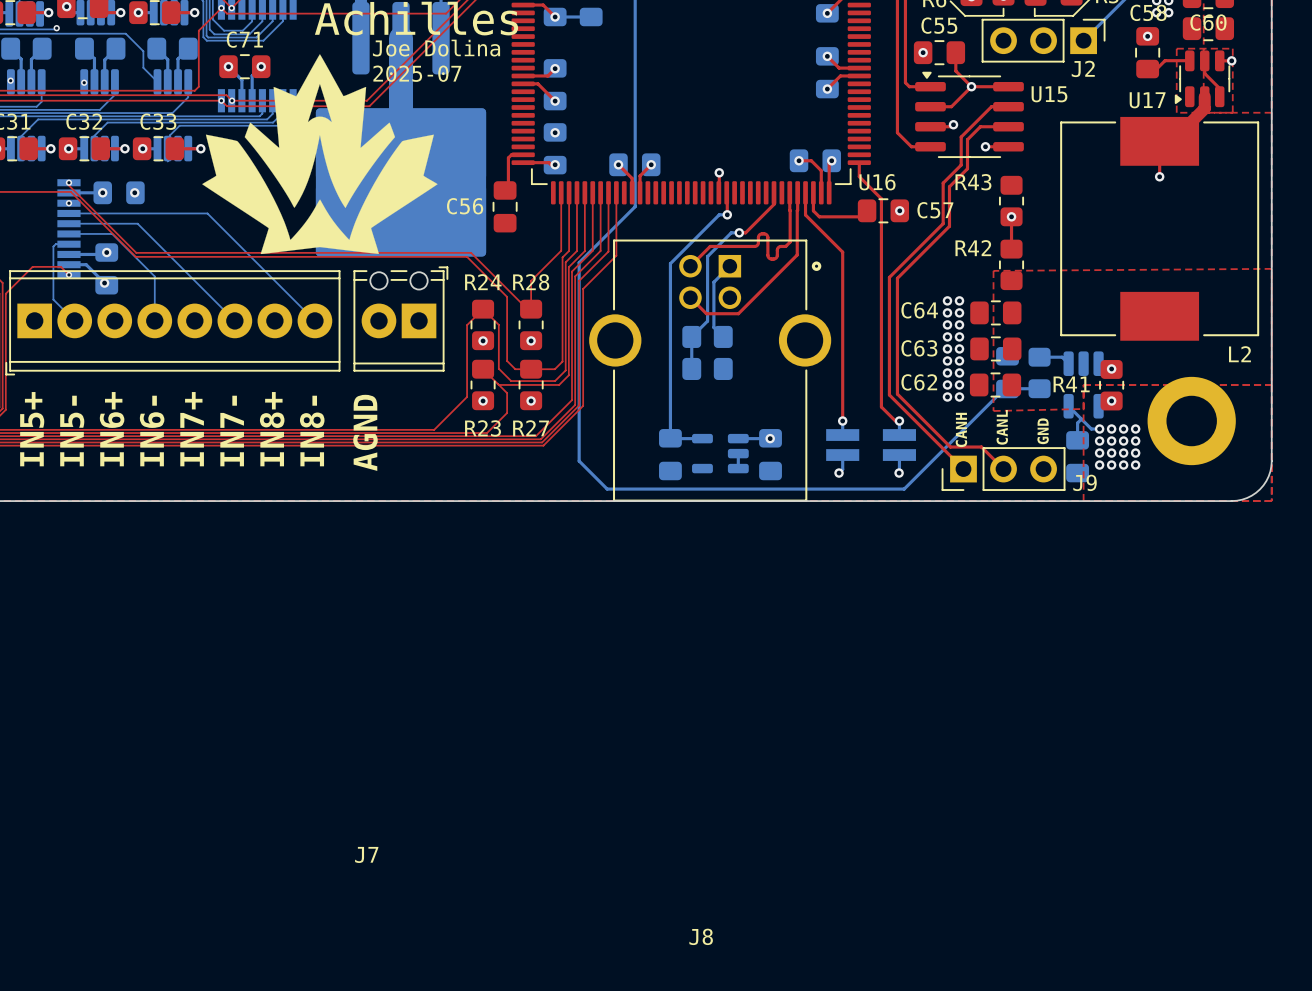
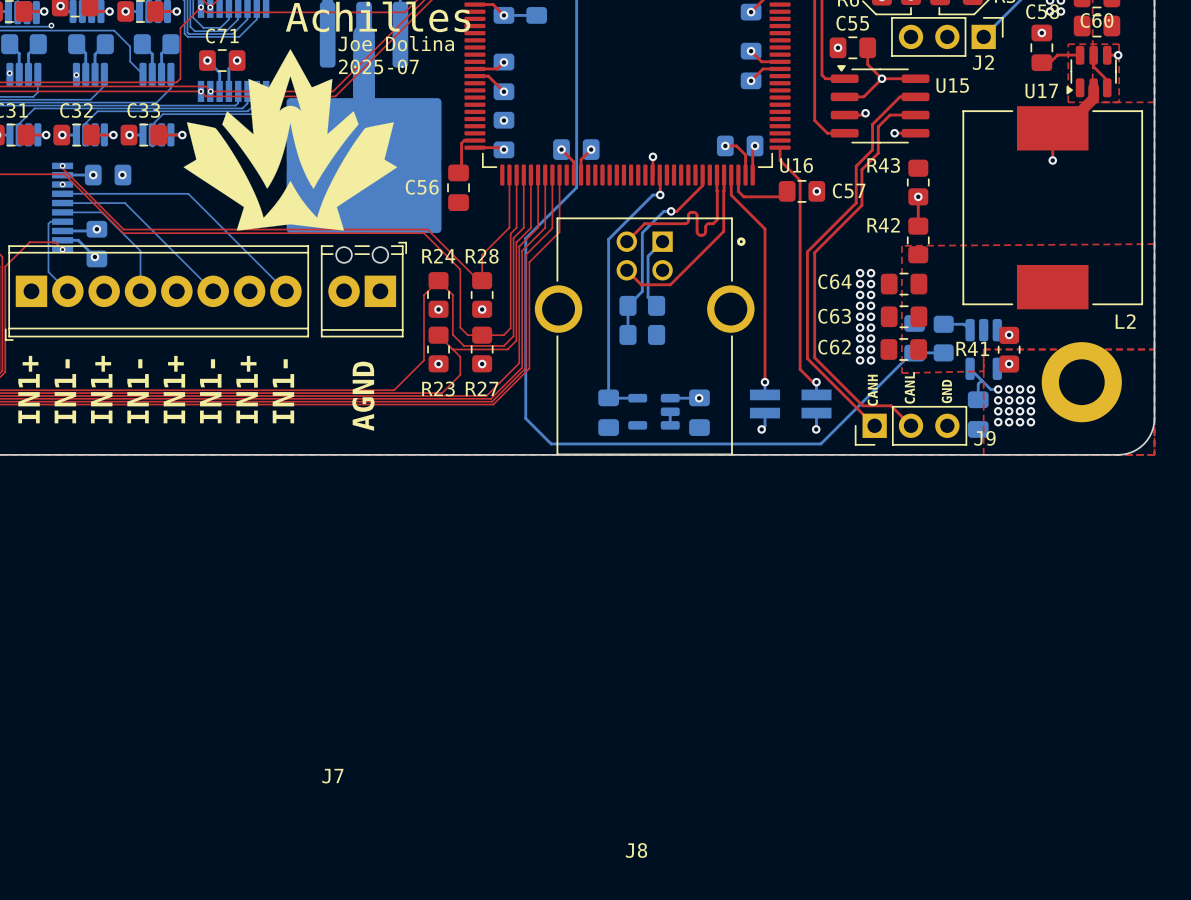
text: IN5+ (32, 429) -> IN1+ (29, 389)
text: IN6+ (112, 429) -> IN1+ (101, 389)
text: IN7+ (192, 429) -> IN1+ (174, 389)
text: IN8+ (272, 429) -> IN1+ (247, 389)
text: IN5- (72, 431) -> IN1- (65, 391)
text: IN6- (152, 431) -> IN1- (138, 391)
text: IN7- (232, 431) -> IN1- (210, 391)
text: IN8- (312, 431) -> IN1- (283, 391)
text position: AGND (365, 432) -> AGND (363, 396)

